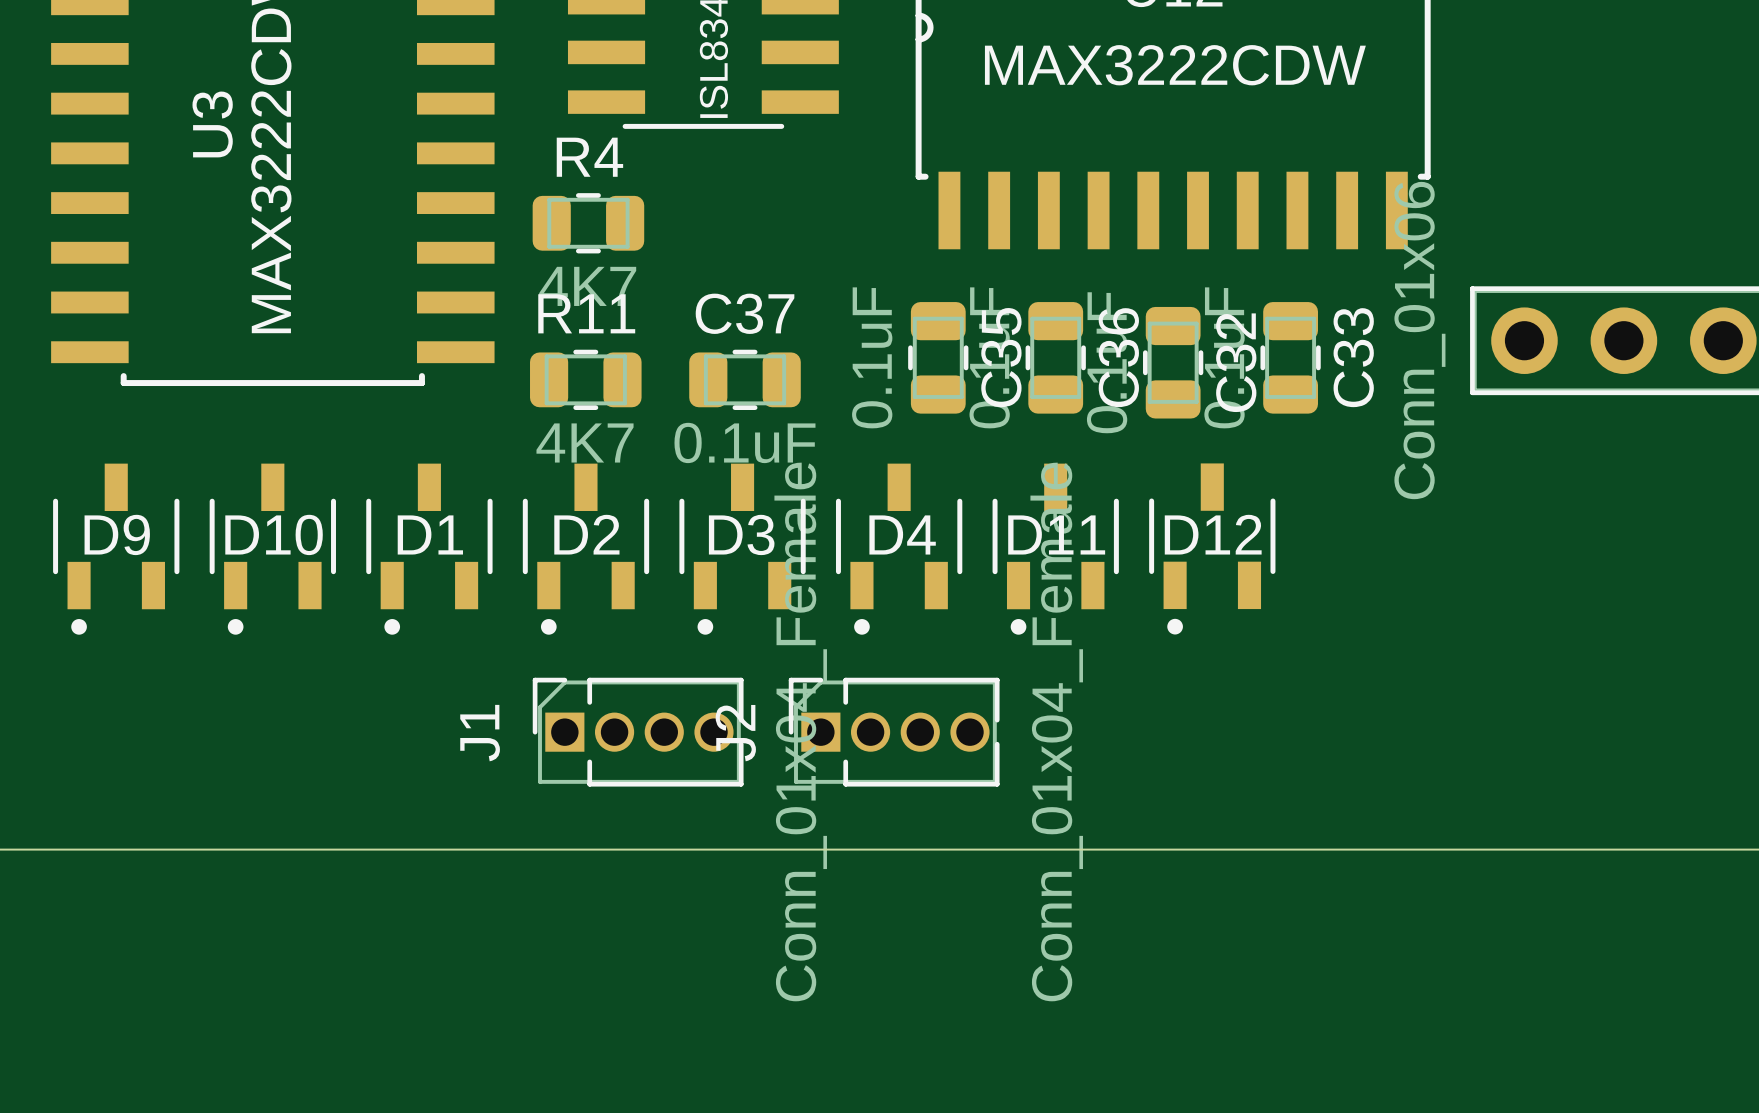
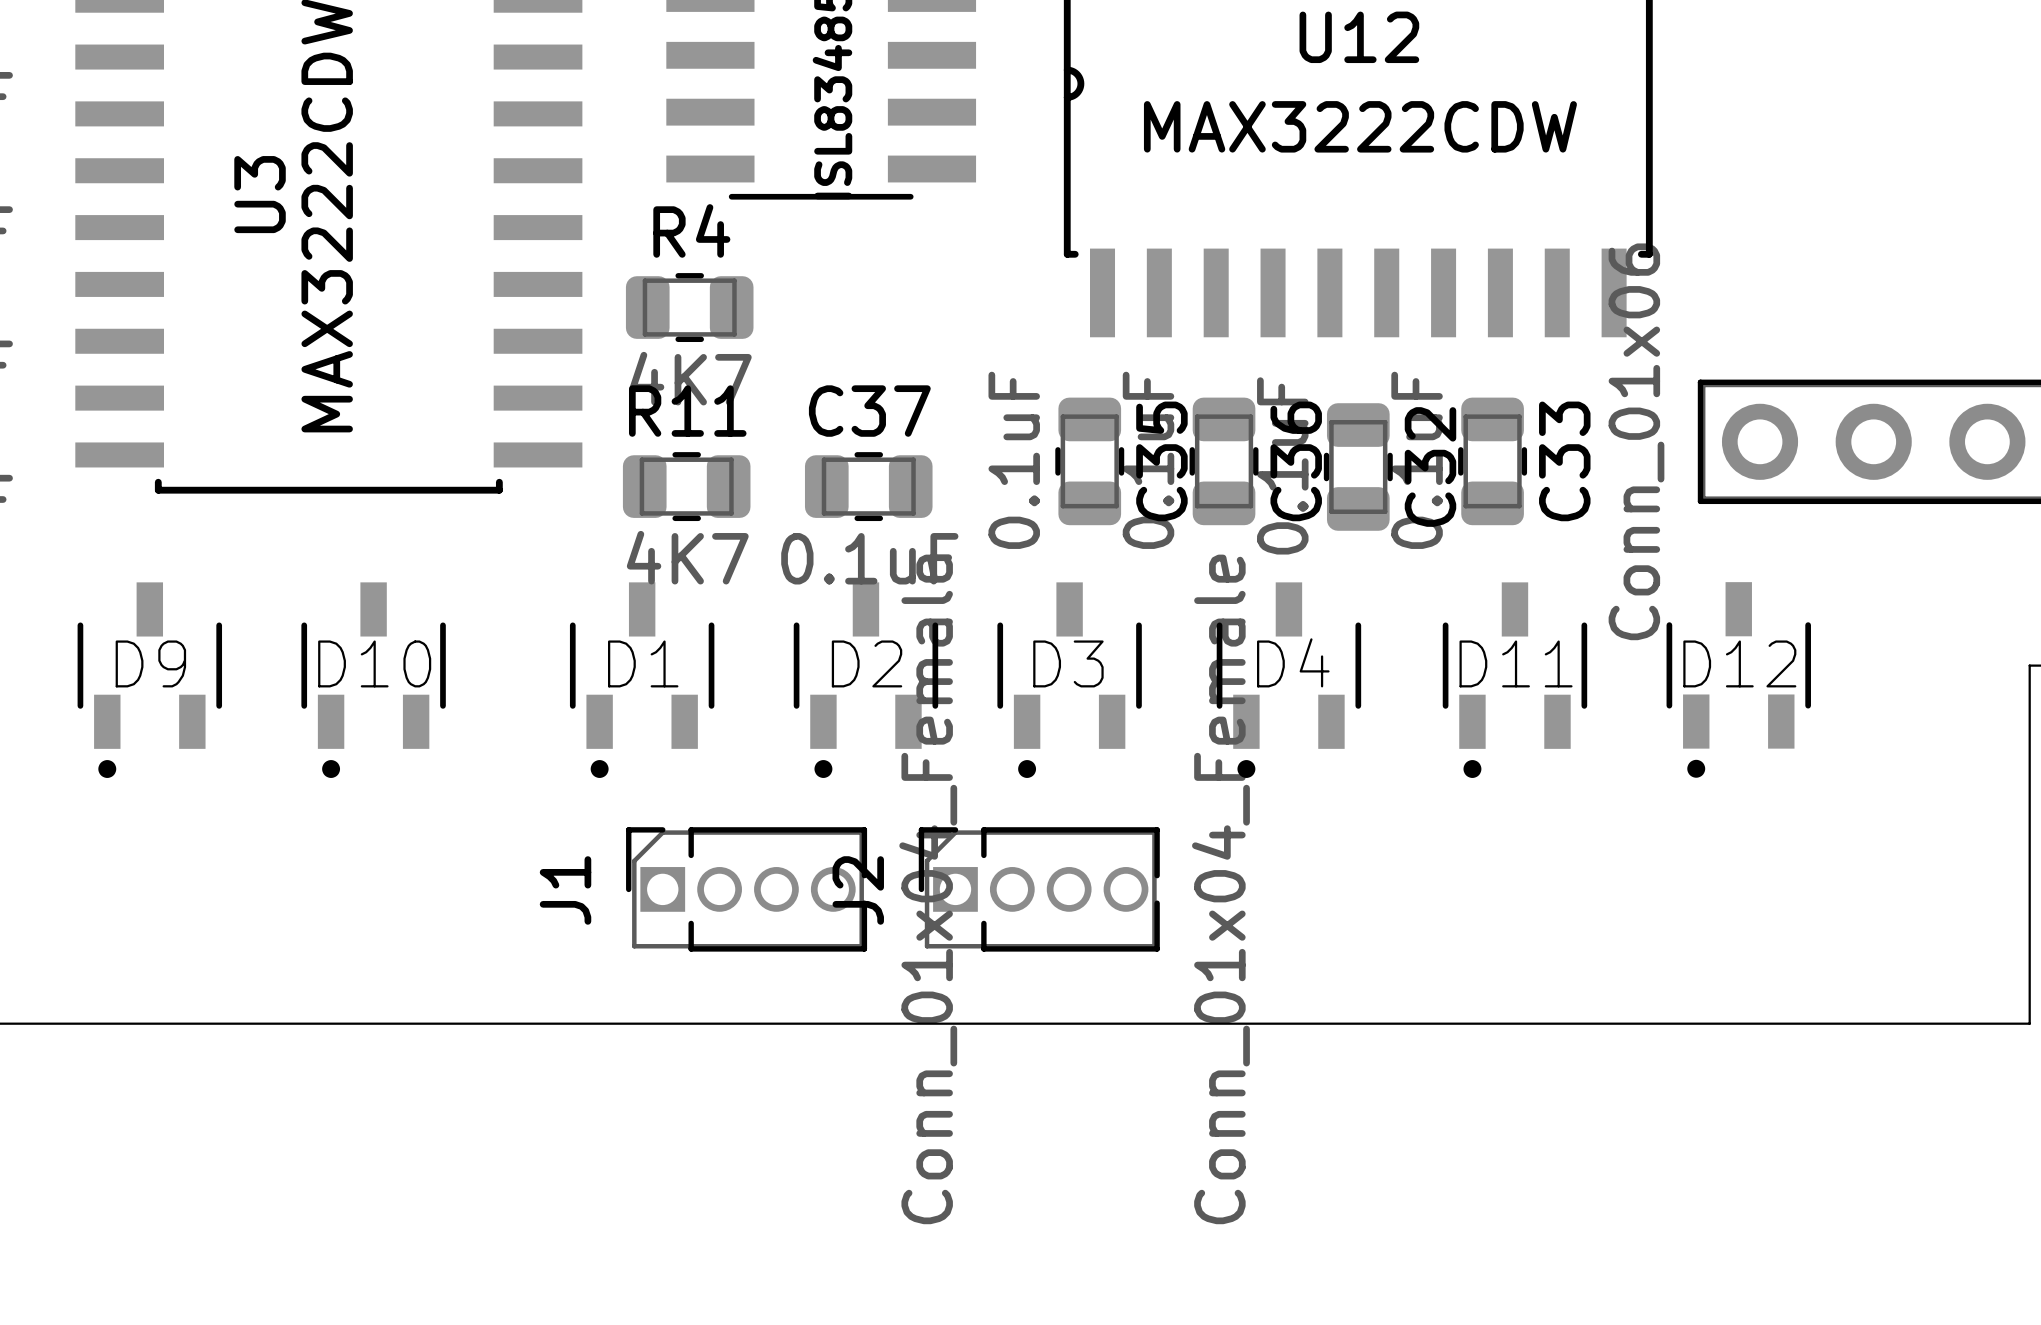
D3 name: D3 (741, 534) -> D2 (867, 663)
D12 position: (1212, 548) -> (1738, 679)
D10 position: (272, 549) -> (373, 680)
D1 position: (429, 549) -> (642, 680)
D2: (585, 549) -> none
D4 position: (899, 549) -> (1288, 680)
D3: none -> (1069, 680)
D11 position: (1055, 549) -> (1514, 680)

